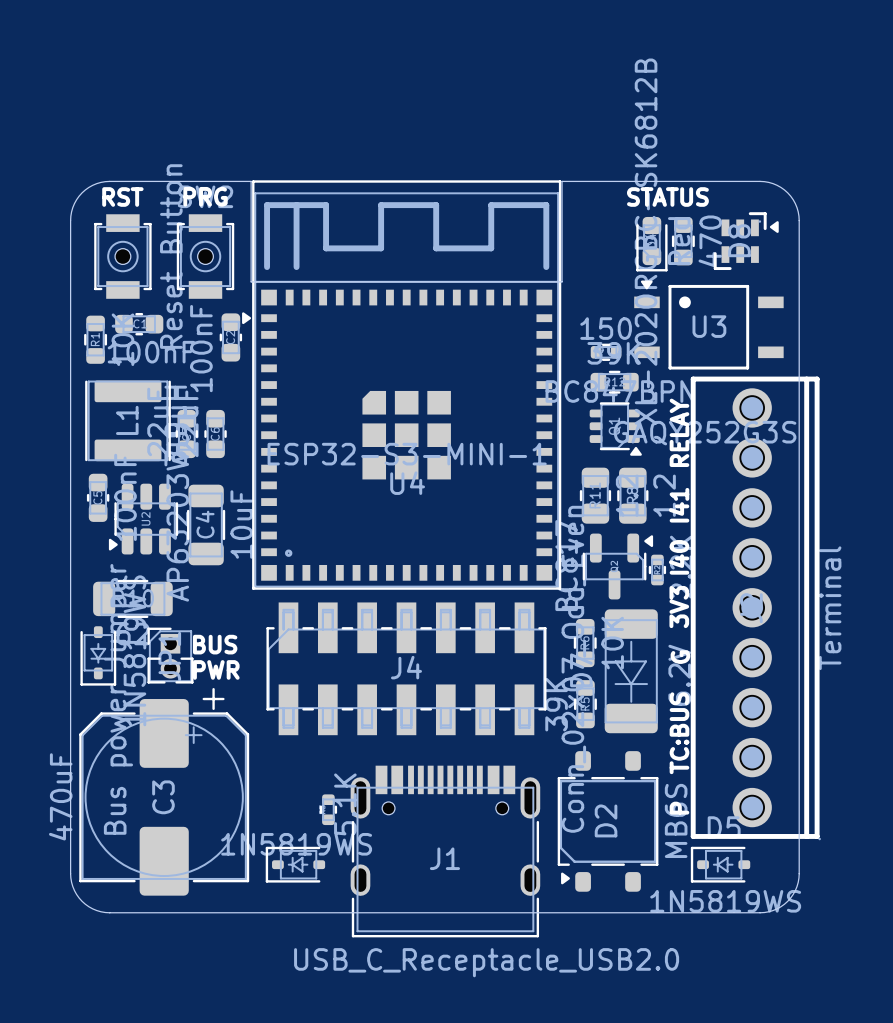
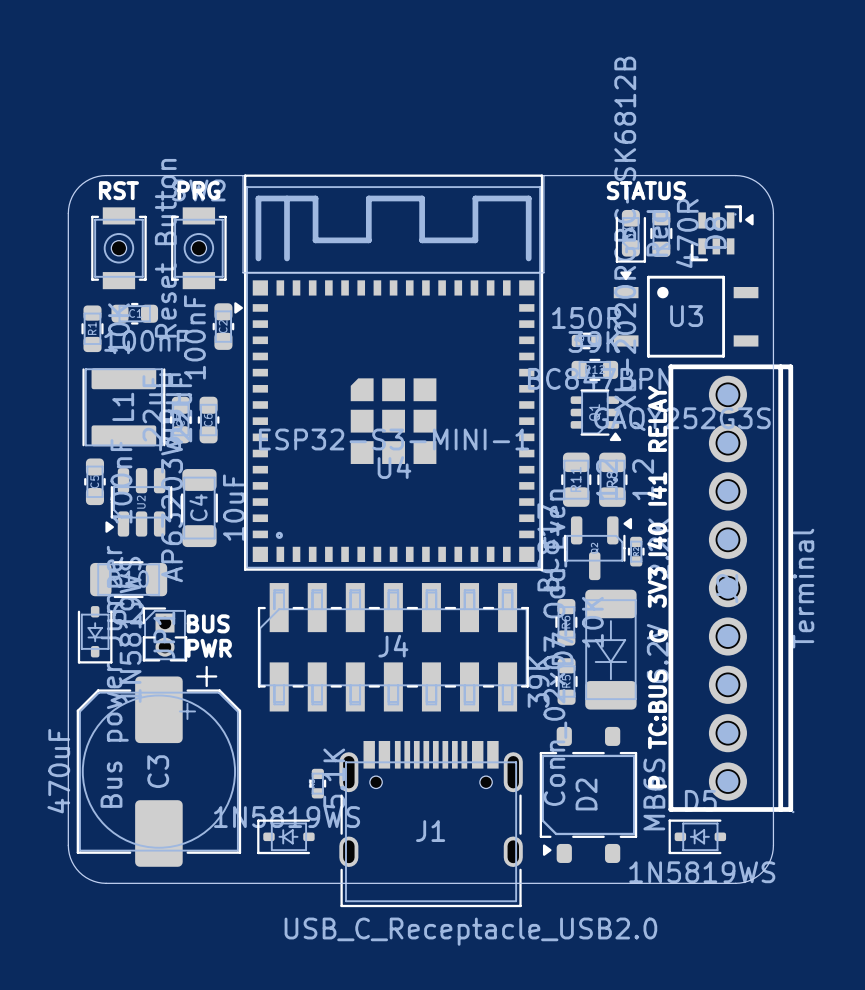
part value: 470 (710, 241) -> 470R (687, 233)
part value: 150 (606, 328) -> 150R (586, 317)

